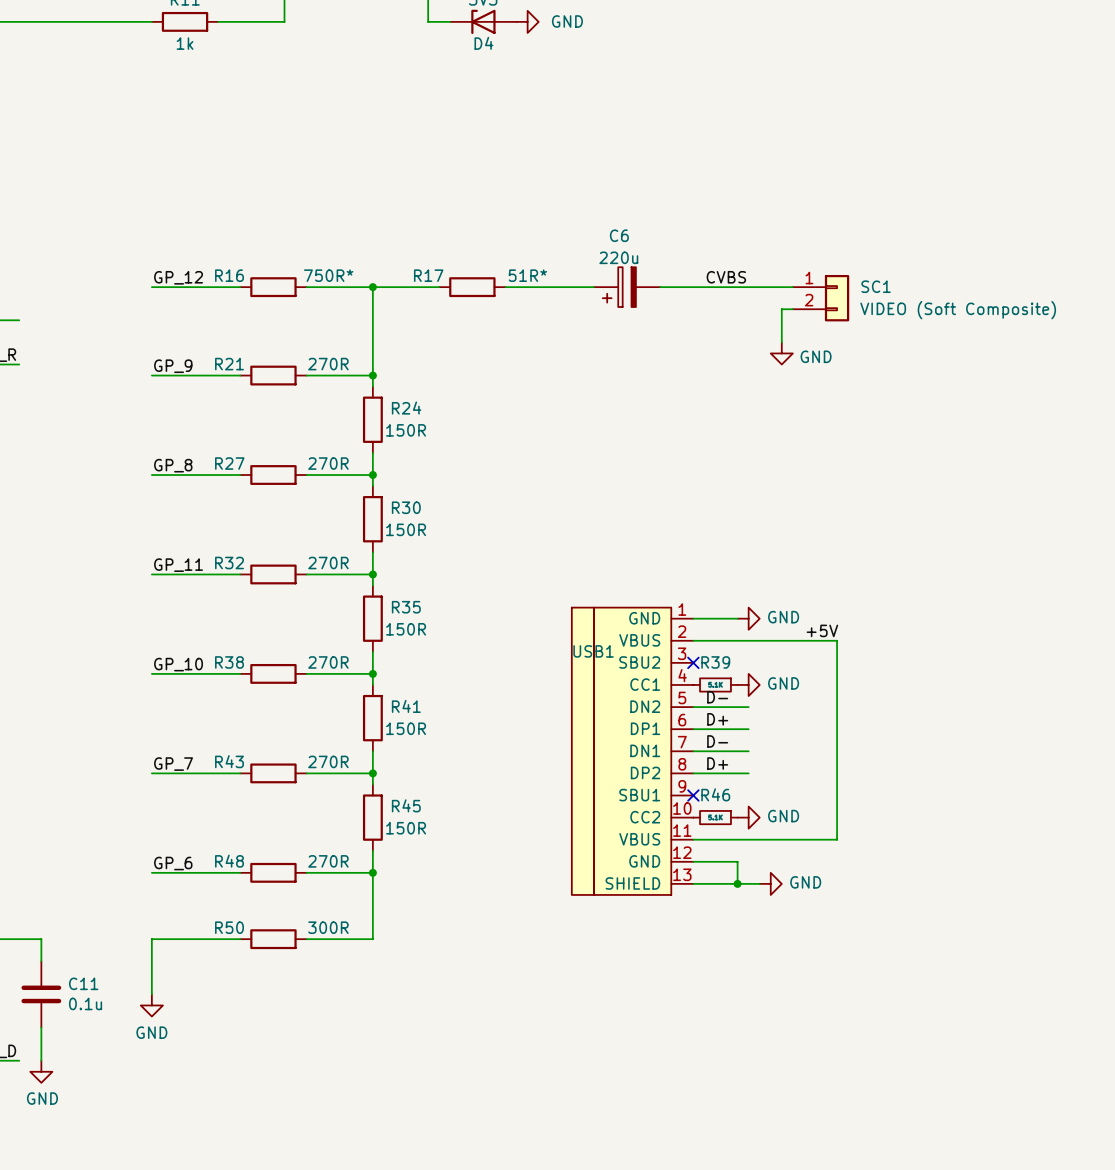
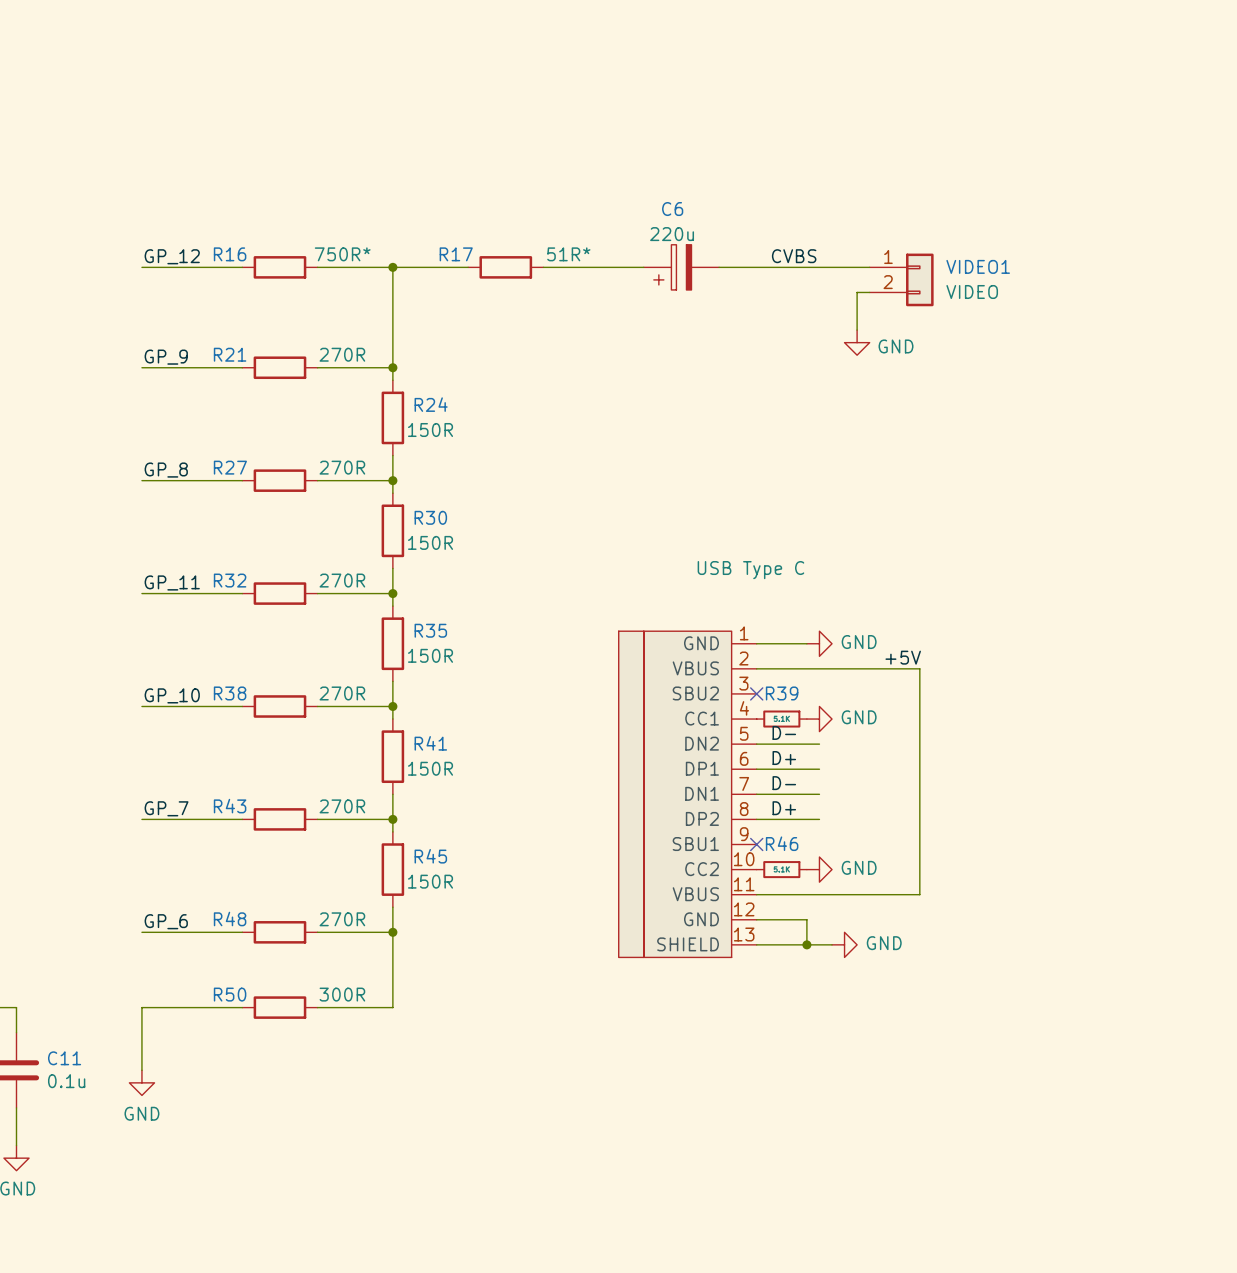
SC1 name: SC1 (876, 286) -> VIDEO1 (978, 266)
SC1 value: VIDEO (Soft Composite) (958, 310) -> VIDEO (972, 291)
USB1 value: none -> USB Type C (750, 570)
USB1 name: USB1 (593, 651) -> none

